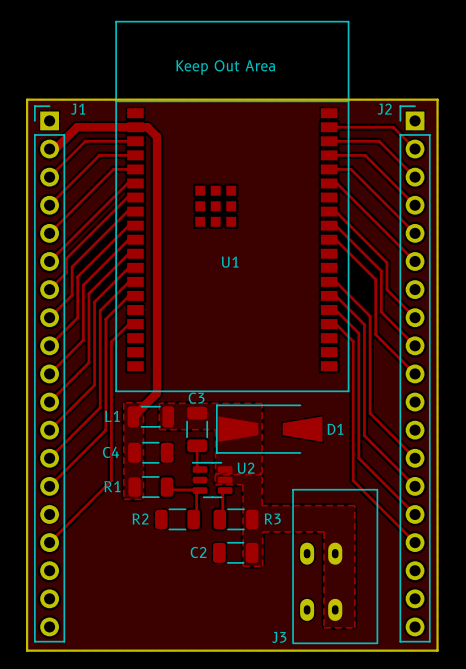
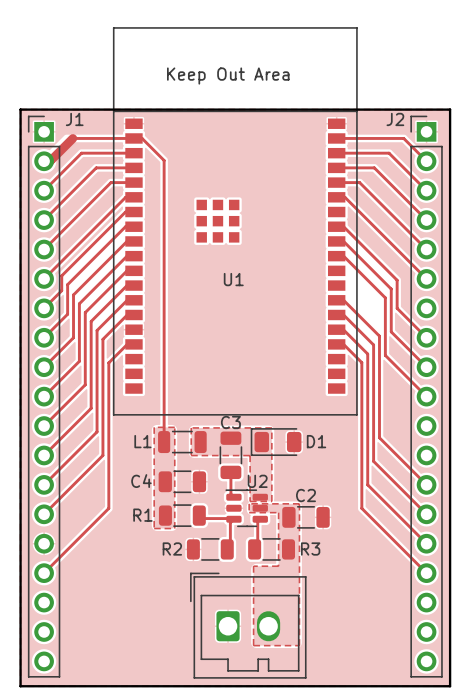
track width: thick (77, 127) (143, 127) -> thin (72, 138) (142, 138)
track: (143, 127) (147, 127) (156, 136) (156, 393) -> (142, 138) (164, 160) (164, 442)
track: (156, 393) (133, 416) -> none
zone outline: (123, 402) (143, 402) (143, 499) (123, 499) (123, 402) -> none
zone outline: (159, 403) (159, 429) (215, 429) (215, 473) (262, 473) (262, 403) (174, 403) -> (158, 427) (154, 427) (154, 528) (174, 528) (174, 427)
zone outline: none -> (191, 427) (271, 427) (271, 501) (250, 501) (250, 455) (191, 455) (191, 427)
D1 footprint: [216, 404, 323, 454] -> [250, 428, 302, 456]
L1 position: (150, 416) -> (182, 442)
C3 position: (197, 429) -> (230, 455)
D1 name position: D1 (335, 429) -> D1 (316, 441)
track: (197, 445) (197, 466) (200, 469) -> (230, 472) (230, 494) (233, 497)
C4 position: (150, 452) -> (182, 481)
U2 name position: U2 (246, 468) -> U2 (257, 481)
zone outline: (215, 474) (262, 474) (262, 505) (354, 505) (354, 627) (323, 627) (323, 532) (262, 532) (262, 566) (243, 566) (243, 484) (215, 484) (215, 474) -> none
zone outline: none -> (249, 503) (299, 503) (299, 645) (253, 645) (253, 566) (278, 566) (278, 512) (249, 512) (249, 503)
U2 position: (212, 480) -> (246, 508)
R1 position: (150, 487) -> (182, 515)
track: (166, 487) (169, 489) (200, 490) (196, 493) (196, 516) (193, 519) -> (199, 515) (202, 518) (233, 519) (230, 522) (230, 546) (227, 549)
track: (225, 490) (222, 492) (222, 516) (219, 519) -> (260, 519) (257, 521) (257, 546) (254, 549)
R2 position: (177, 519) -> (210, 549)
R3 position: (235, 519) -> (271, 549)
C2 name position: C2 (198, 552) -> C2 (305, 495)
C2 position: (235, 552) -> (305, 517)
J3: (335, 566) -> none
part: none -> (248, 625)

